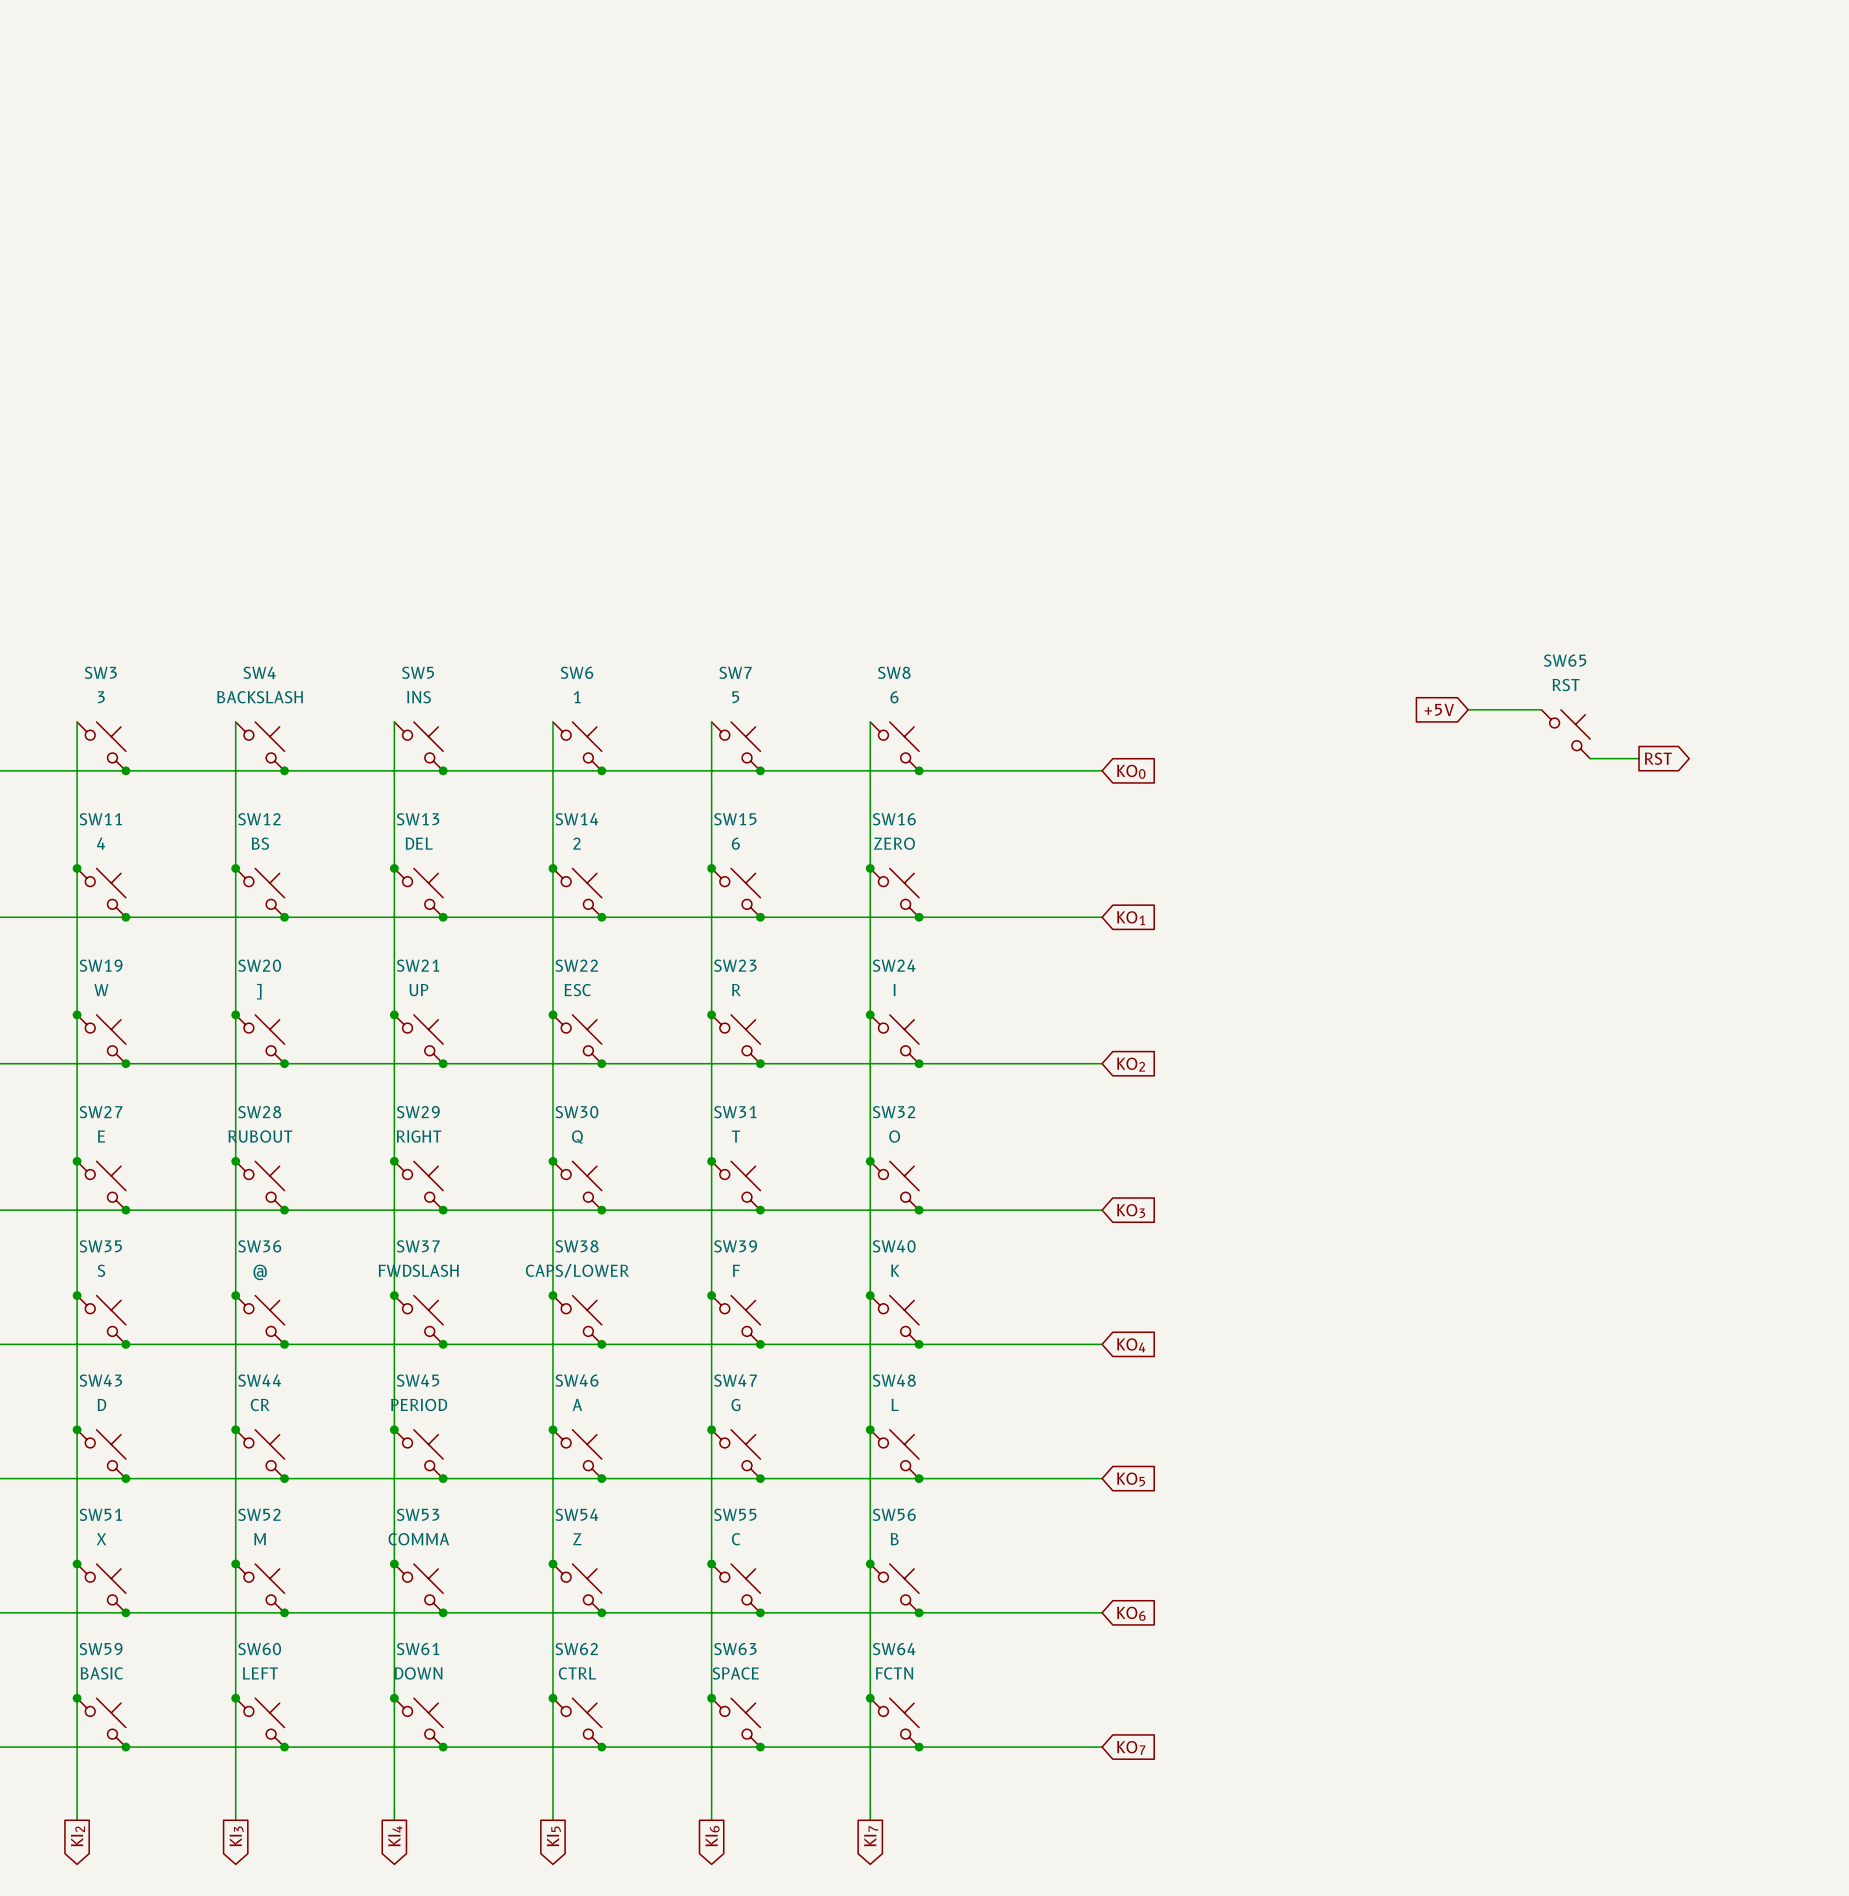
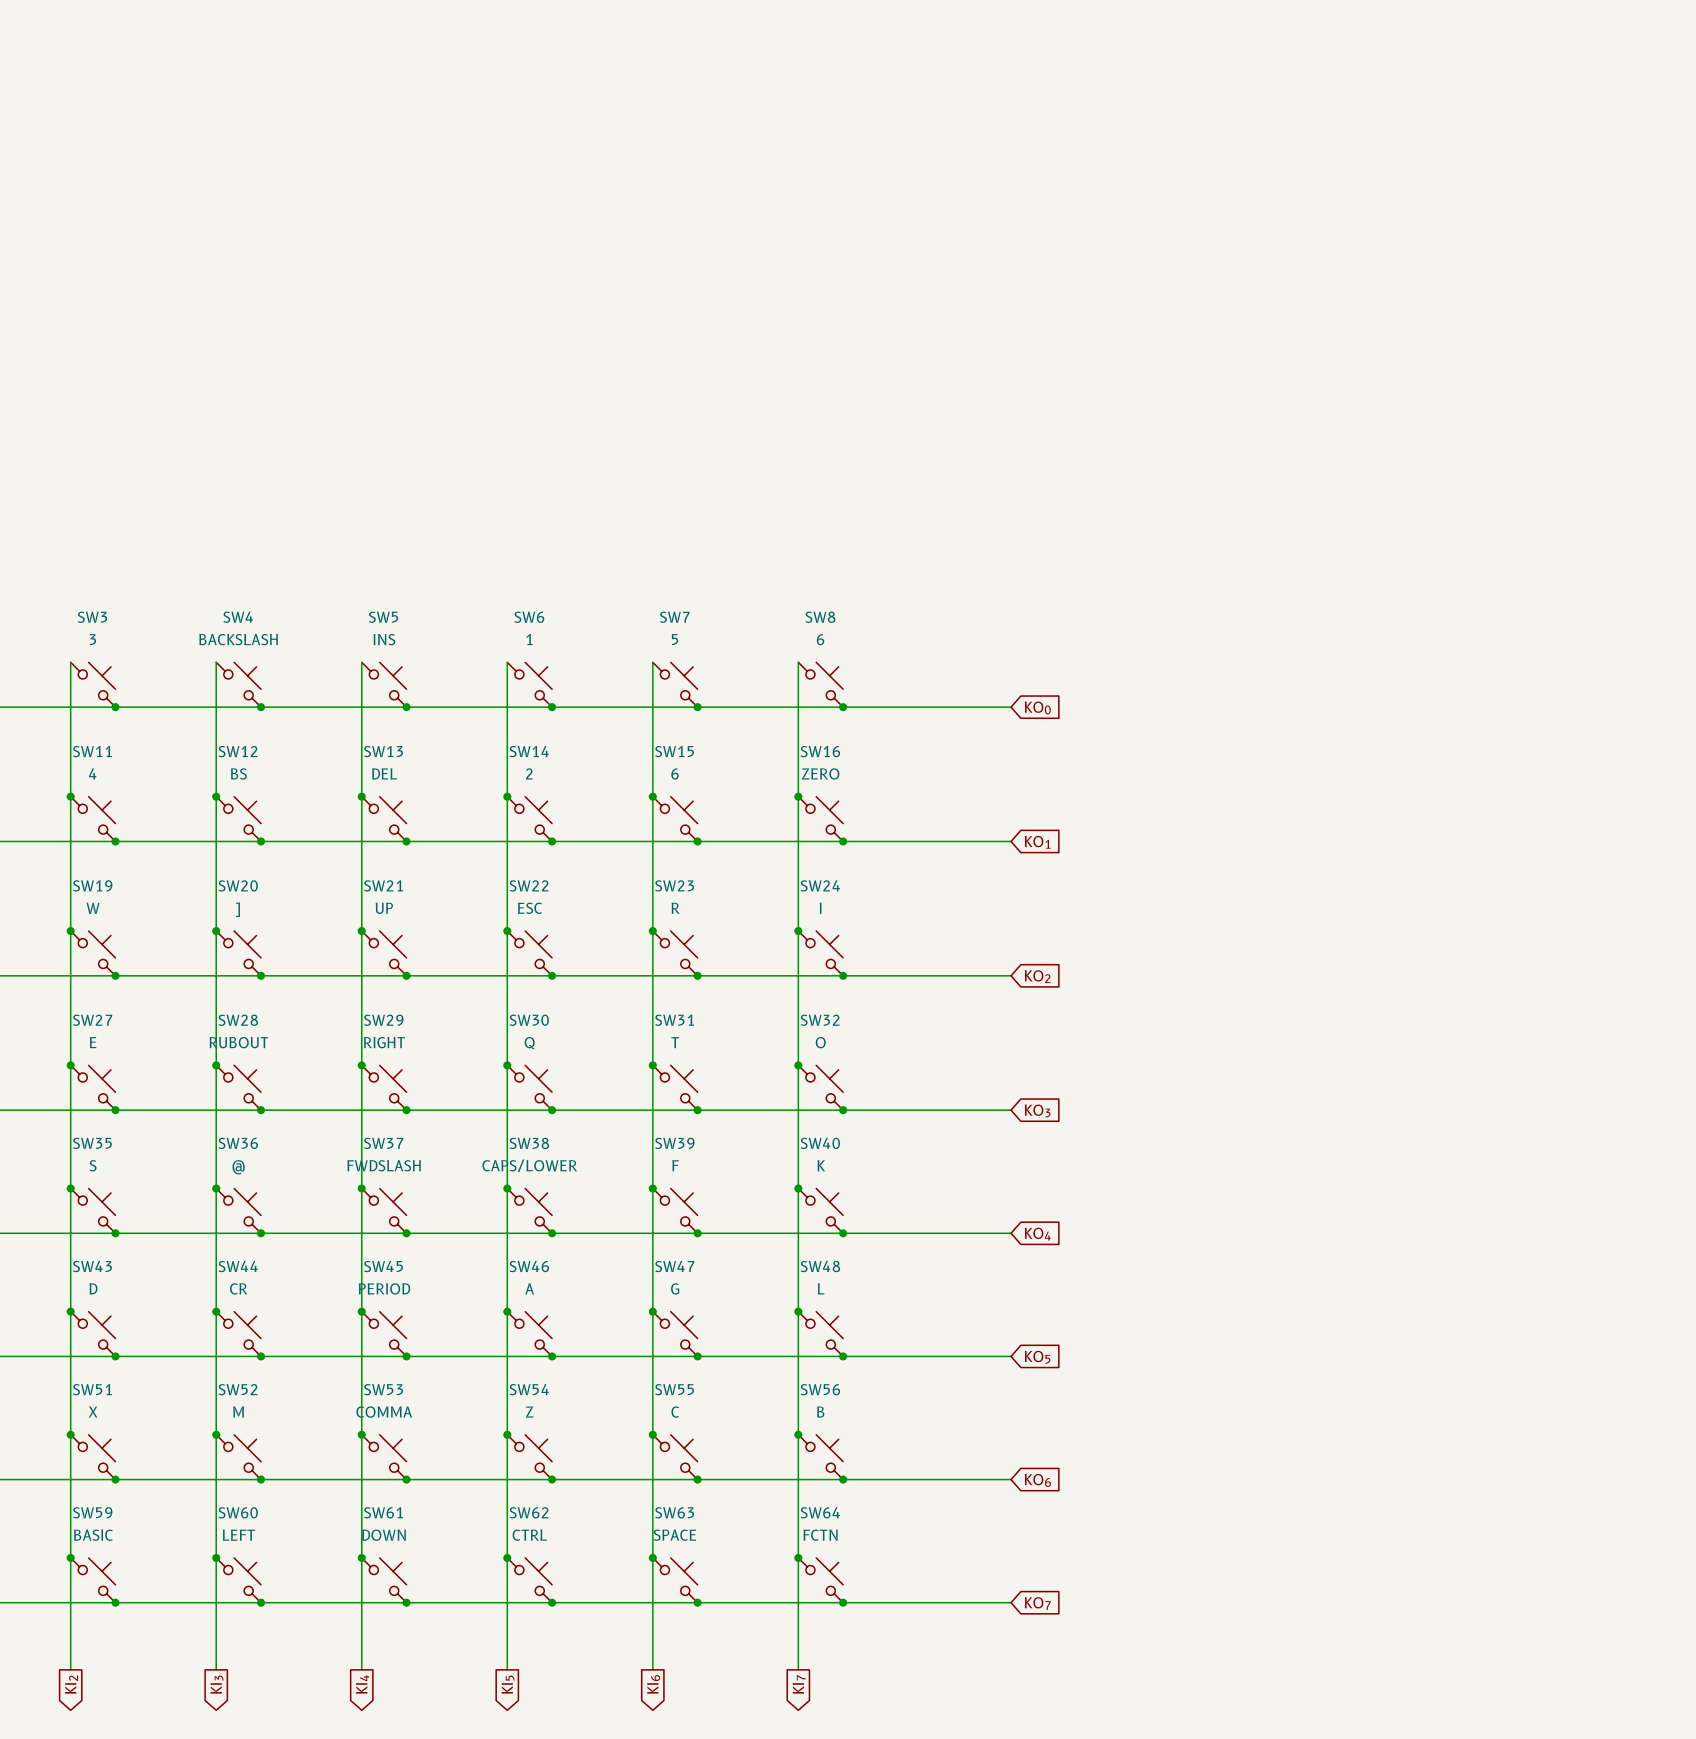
global label: +5V (1439, 709) -> none
wire: (1468, 709) (1541, 709) -> none
SW65: RST (1565, 734) -> none
wire: (1590, 758) (1639, 758) -> none
global label: RST (1658, 758) -> none

